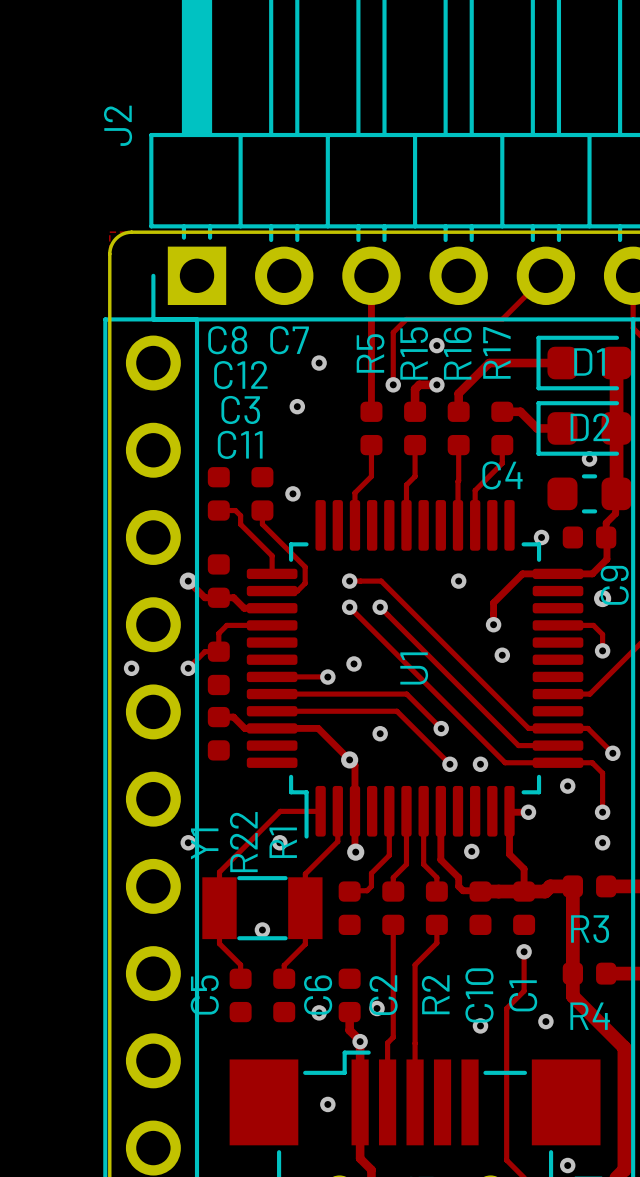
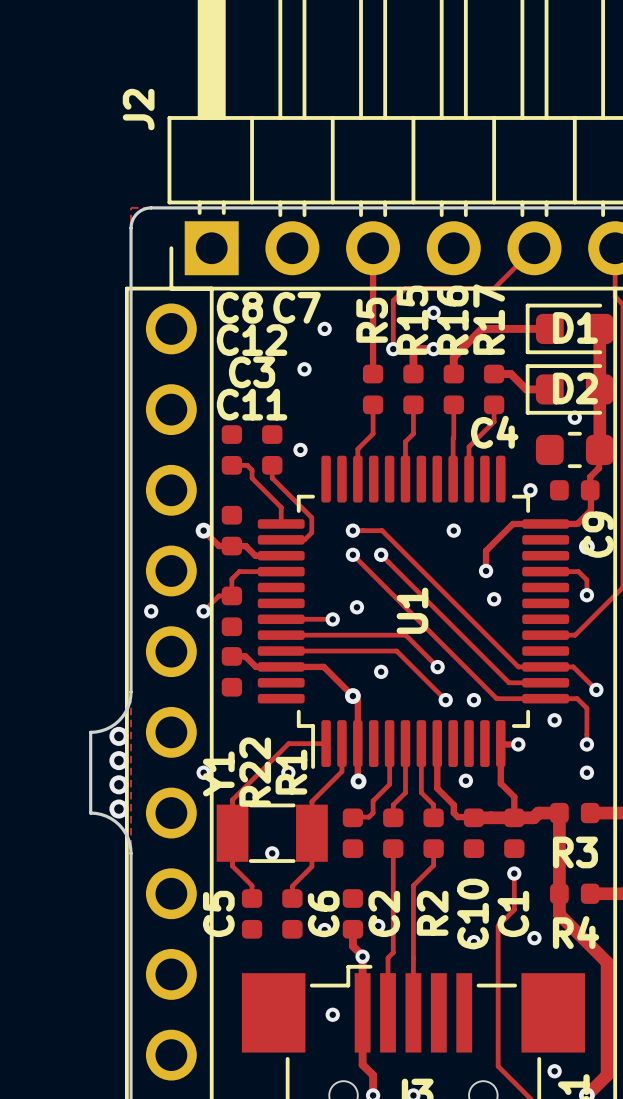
board edge: (109, 755) (109, 930) -> (131, 692) (127, 707) (119, 720) (106, 729) (90, 732) (90, 813) (106, 816) (119, 824) (127, 837) (131, 853)
via: none -> (118, 736)
via: none -> (118, 760)
via: none -> (118, 784)
via: none -> (118, 809)

